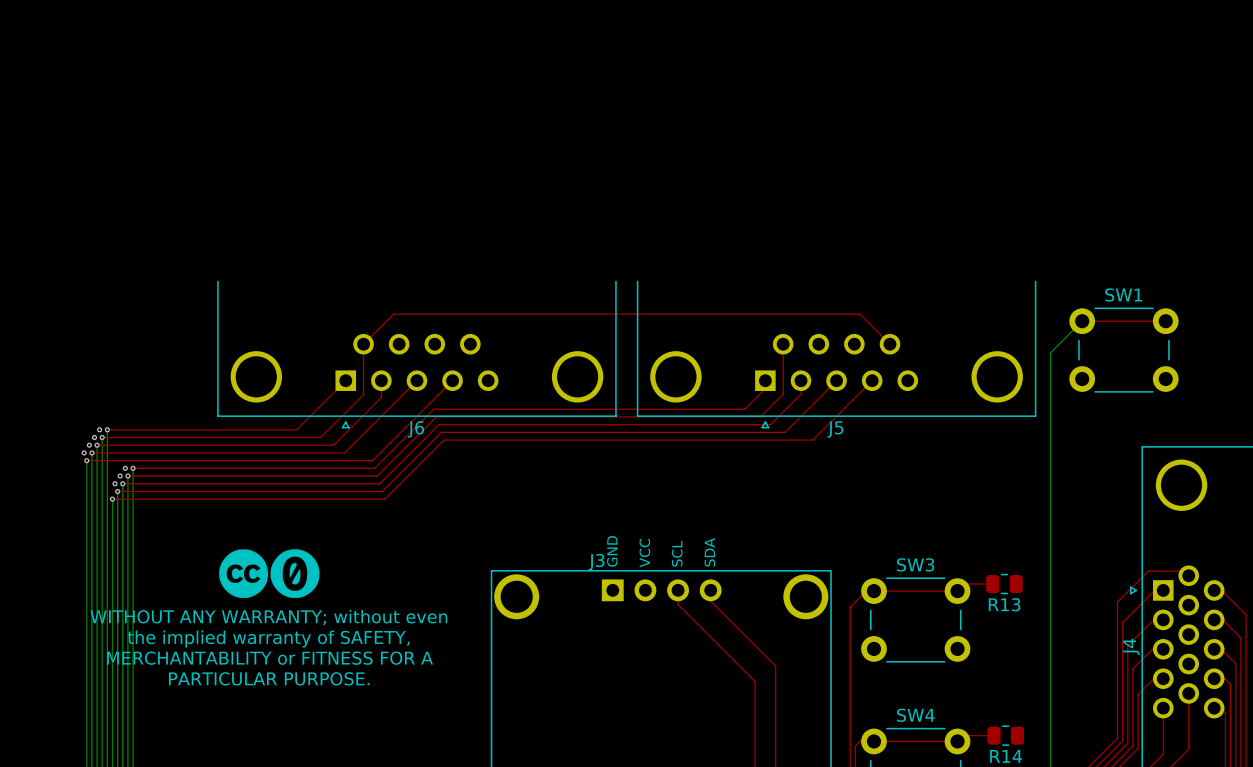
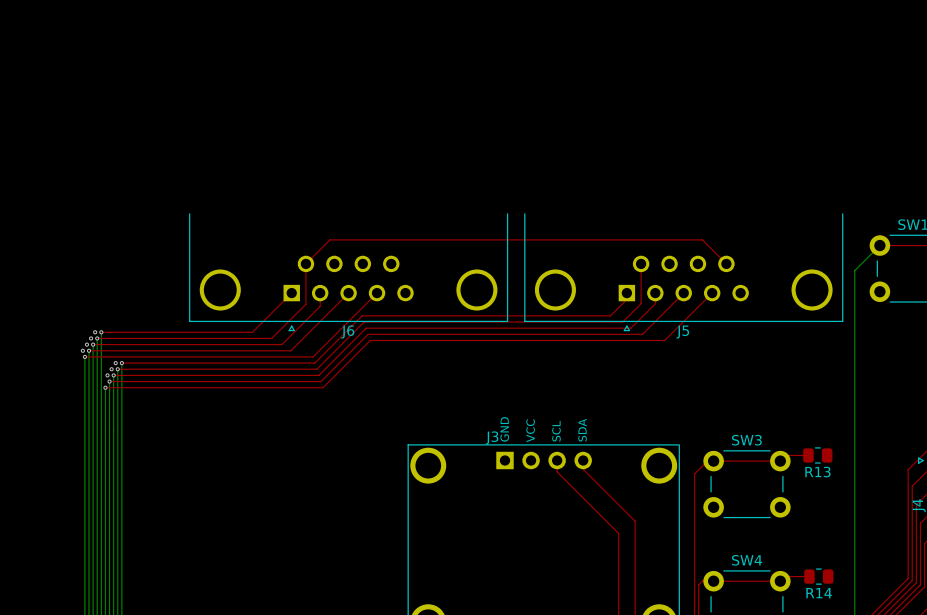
drawing: [219, 549, 320, 599] -> none
text: WITHOUT ANY WARRANTY; without even (268, 617) -> none
text: the implied warranty of SAFETY, (268, 639) -> none
text: MERCHANTABILITY or FITNESS FOR A (270, 658) -> none
text: PARTICULAR PURPOSE. (269, 678) -> none

